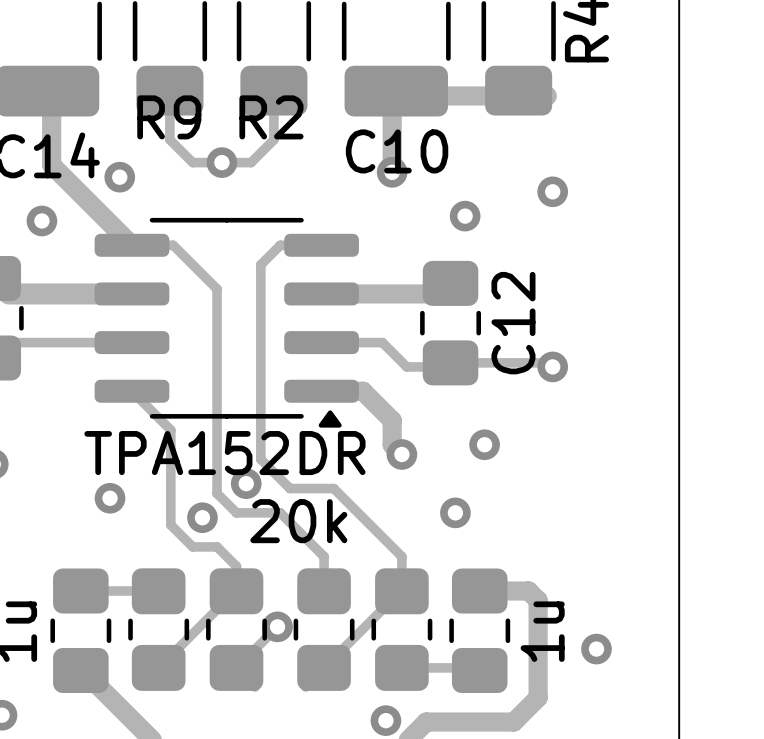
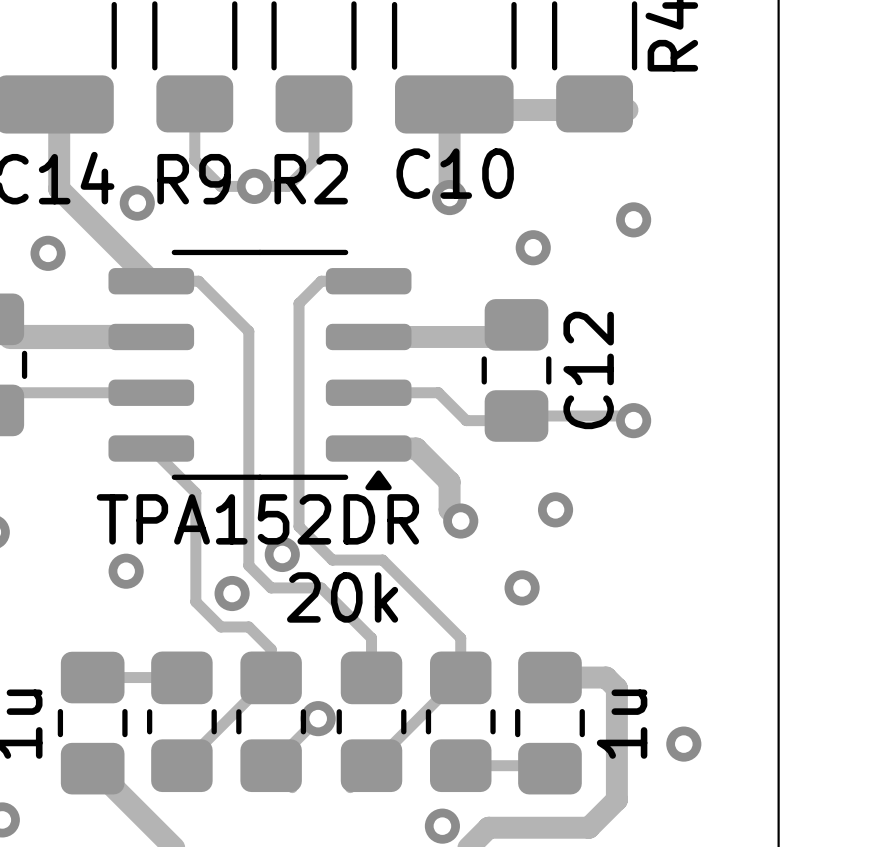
R9 name position: R9 (169, 117) -> R9 (194, 179)
R2 name position: R2 (271, 117) -> R2 (311, 179)

